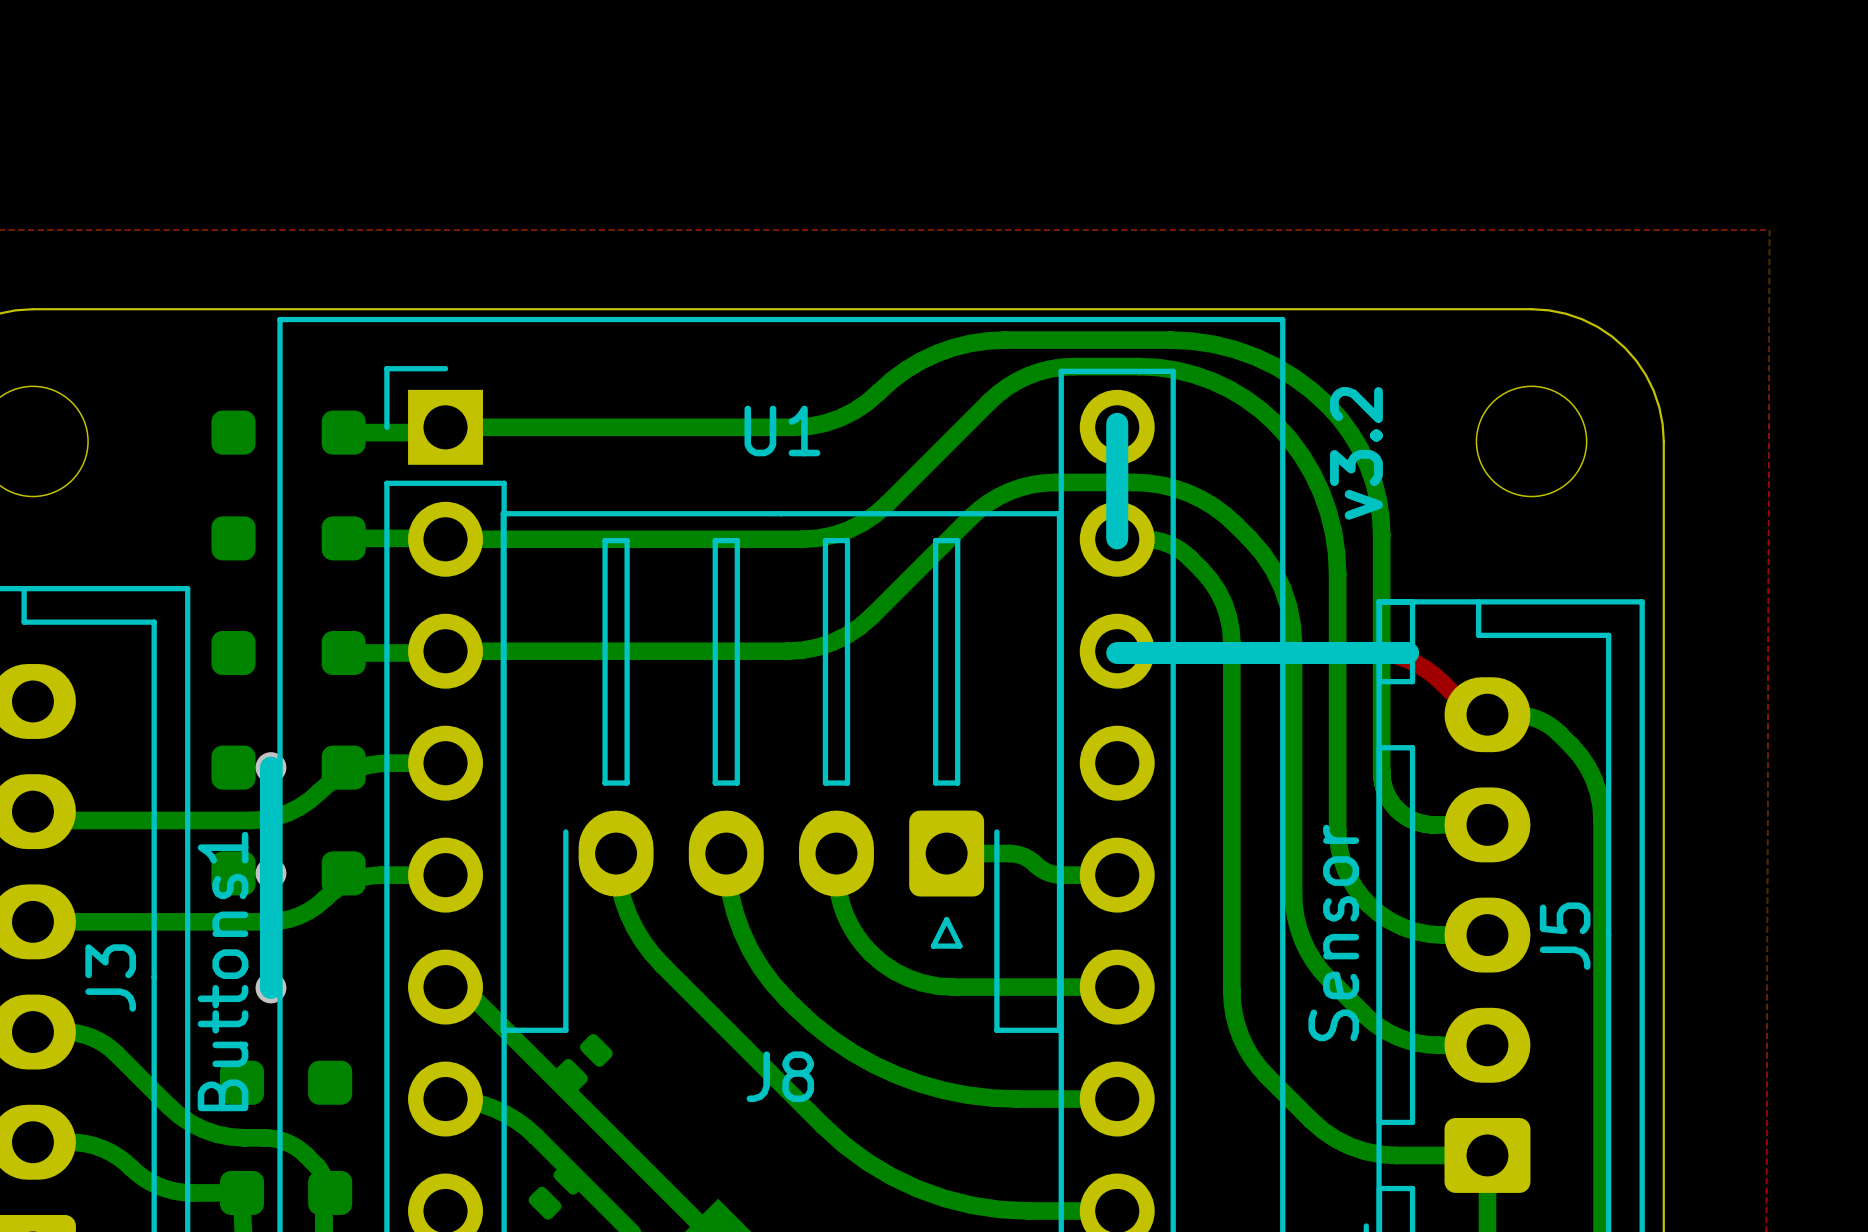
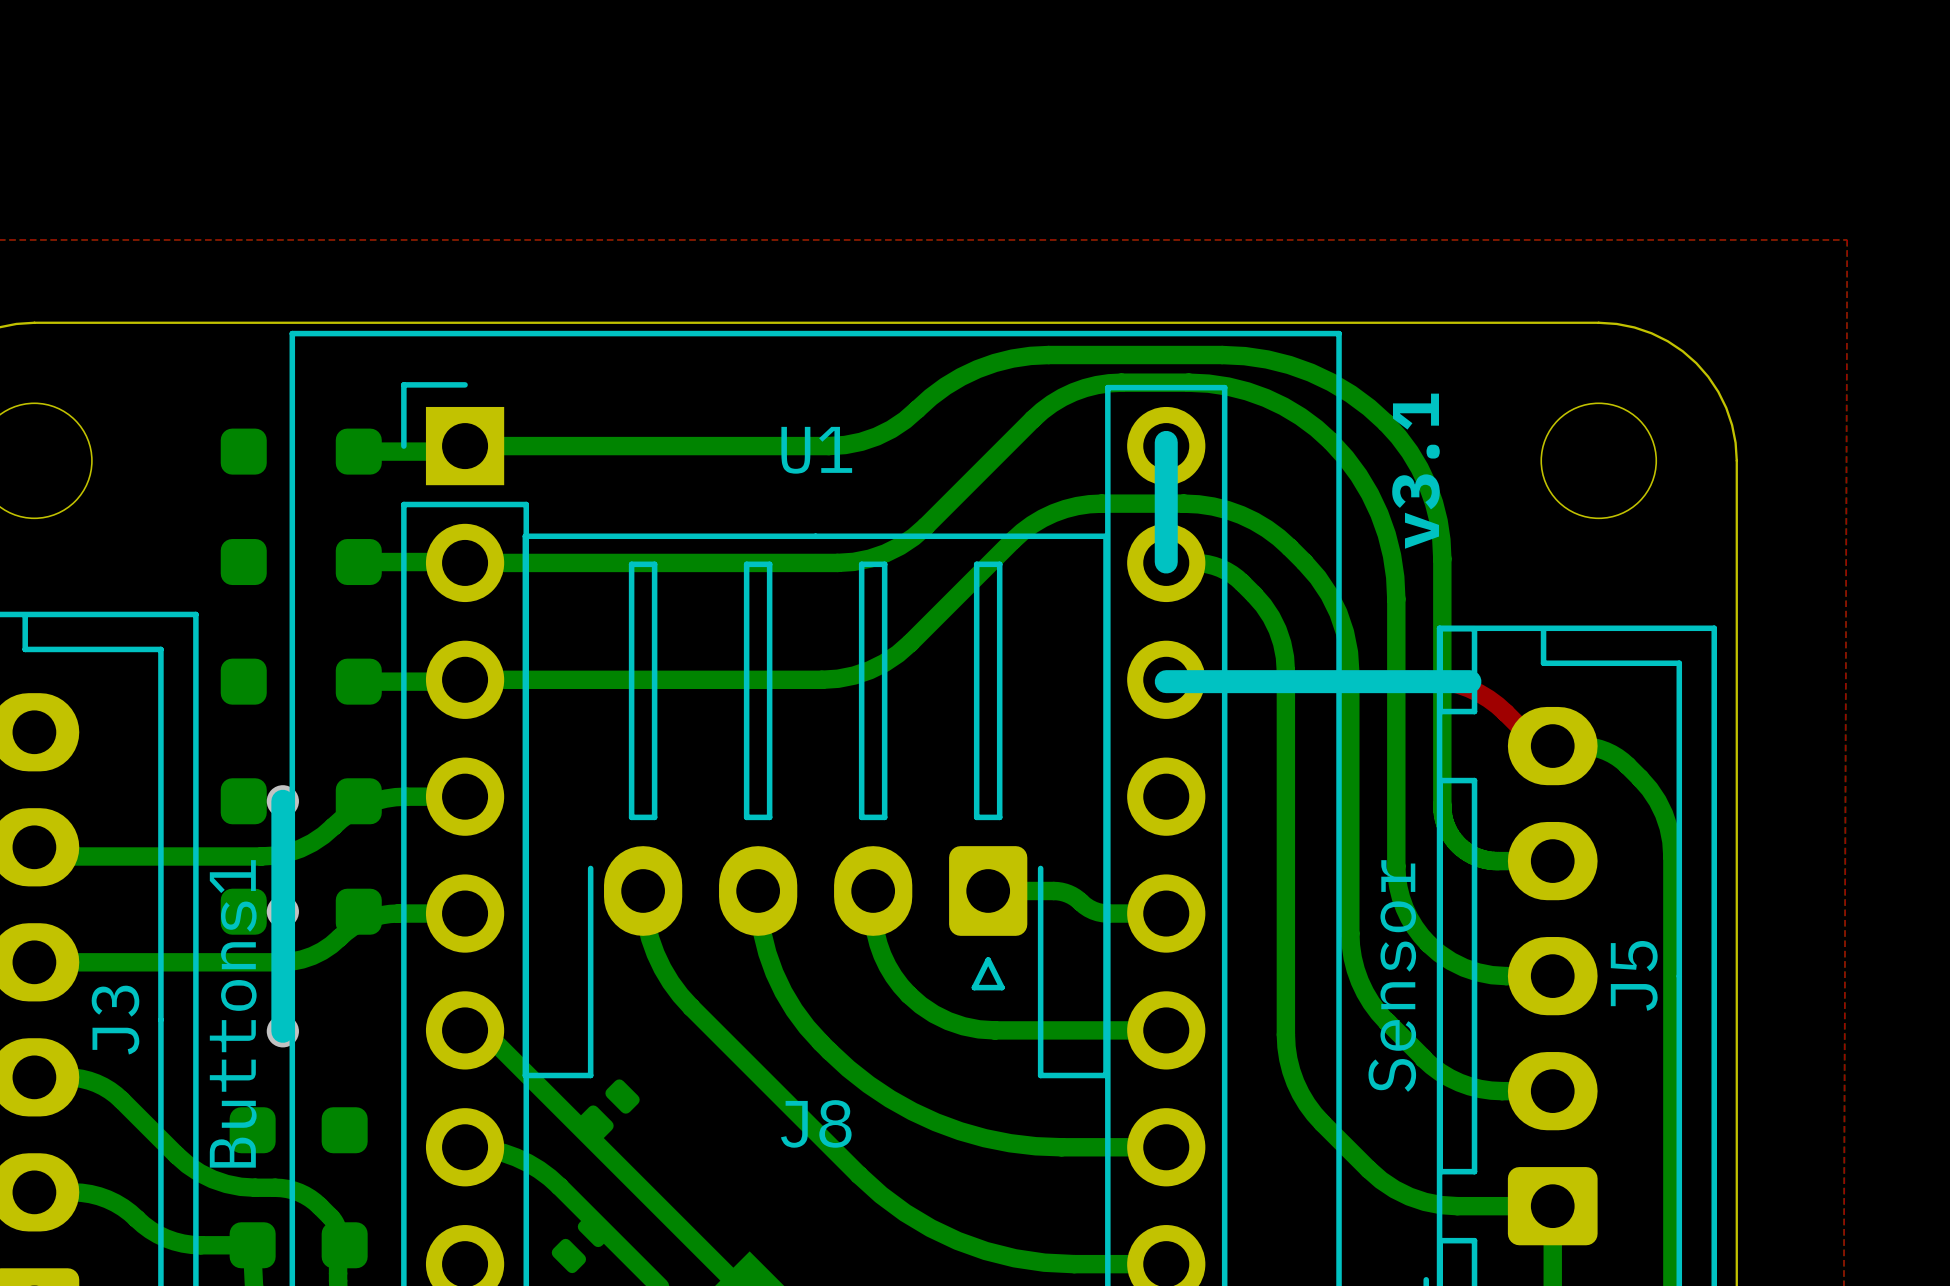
text: v3.2 (1356, 453) -> v3.1 (1415, 471)

